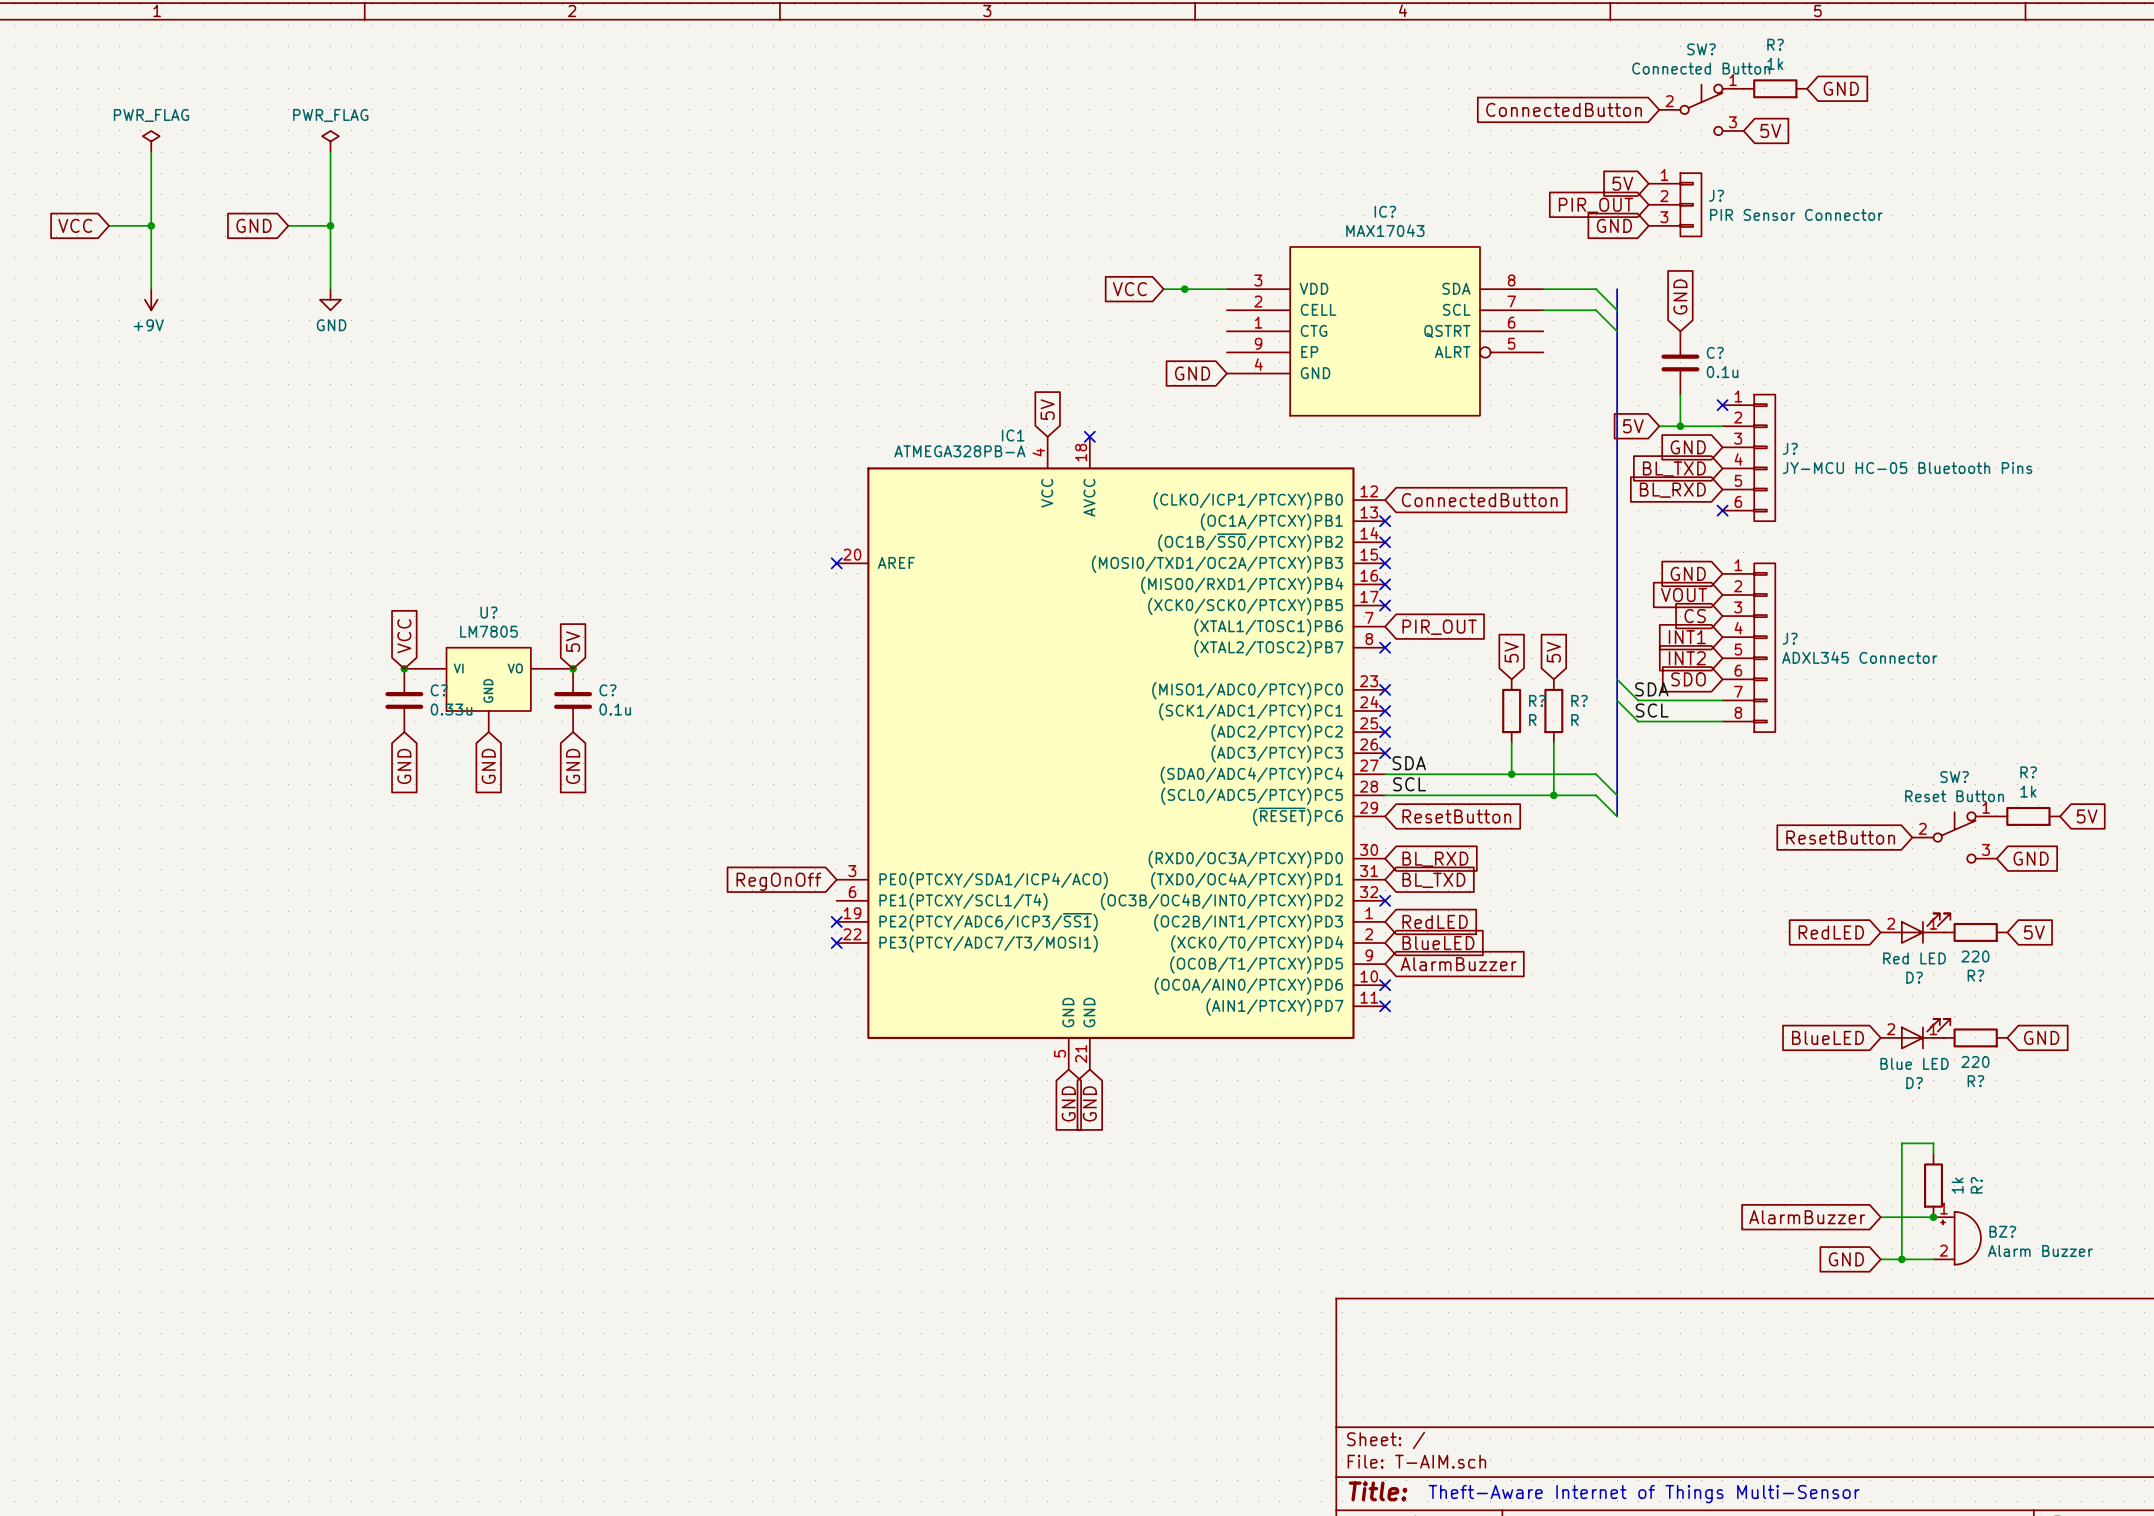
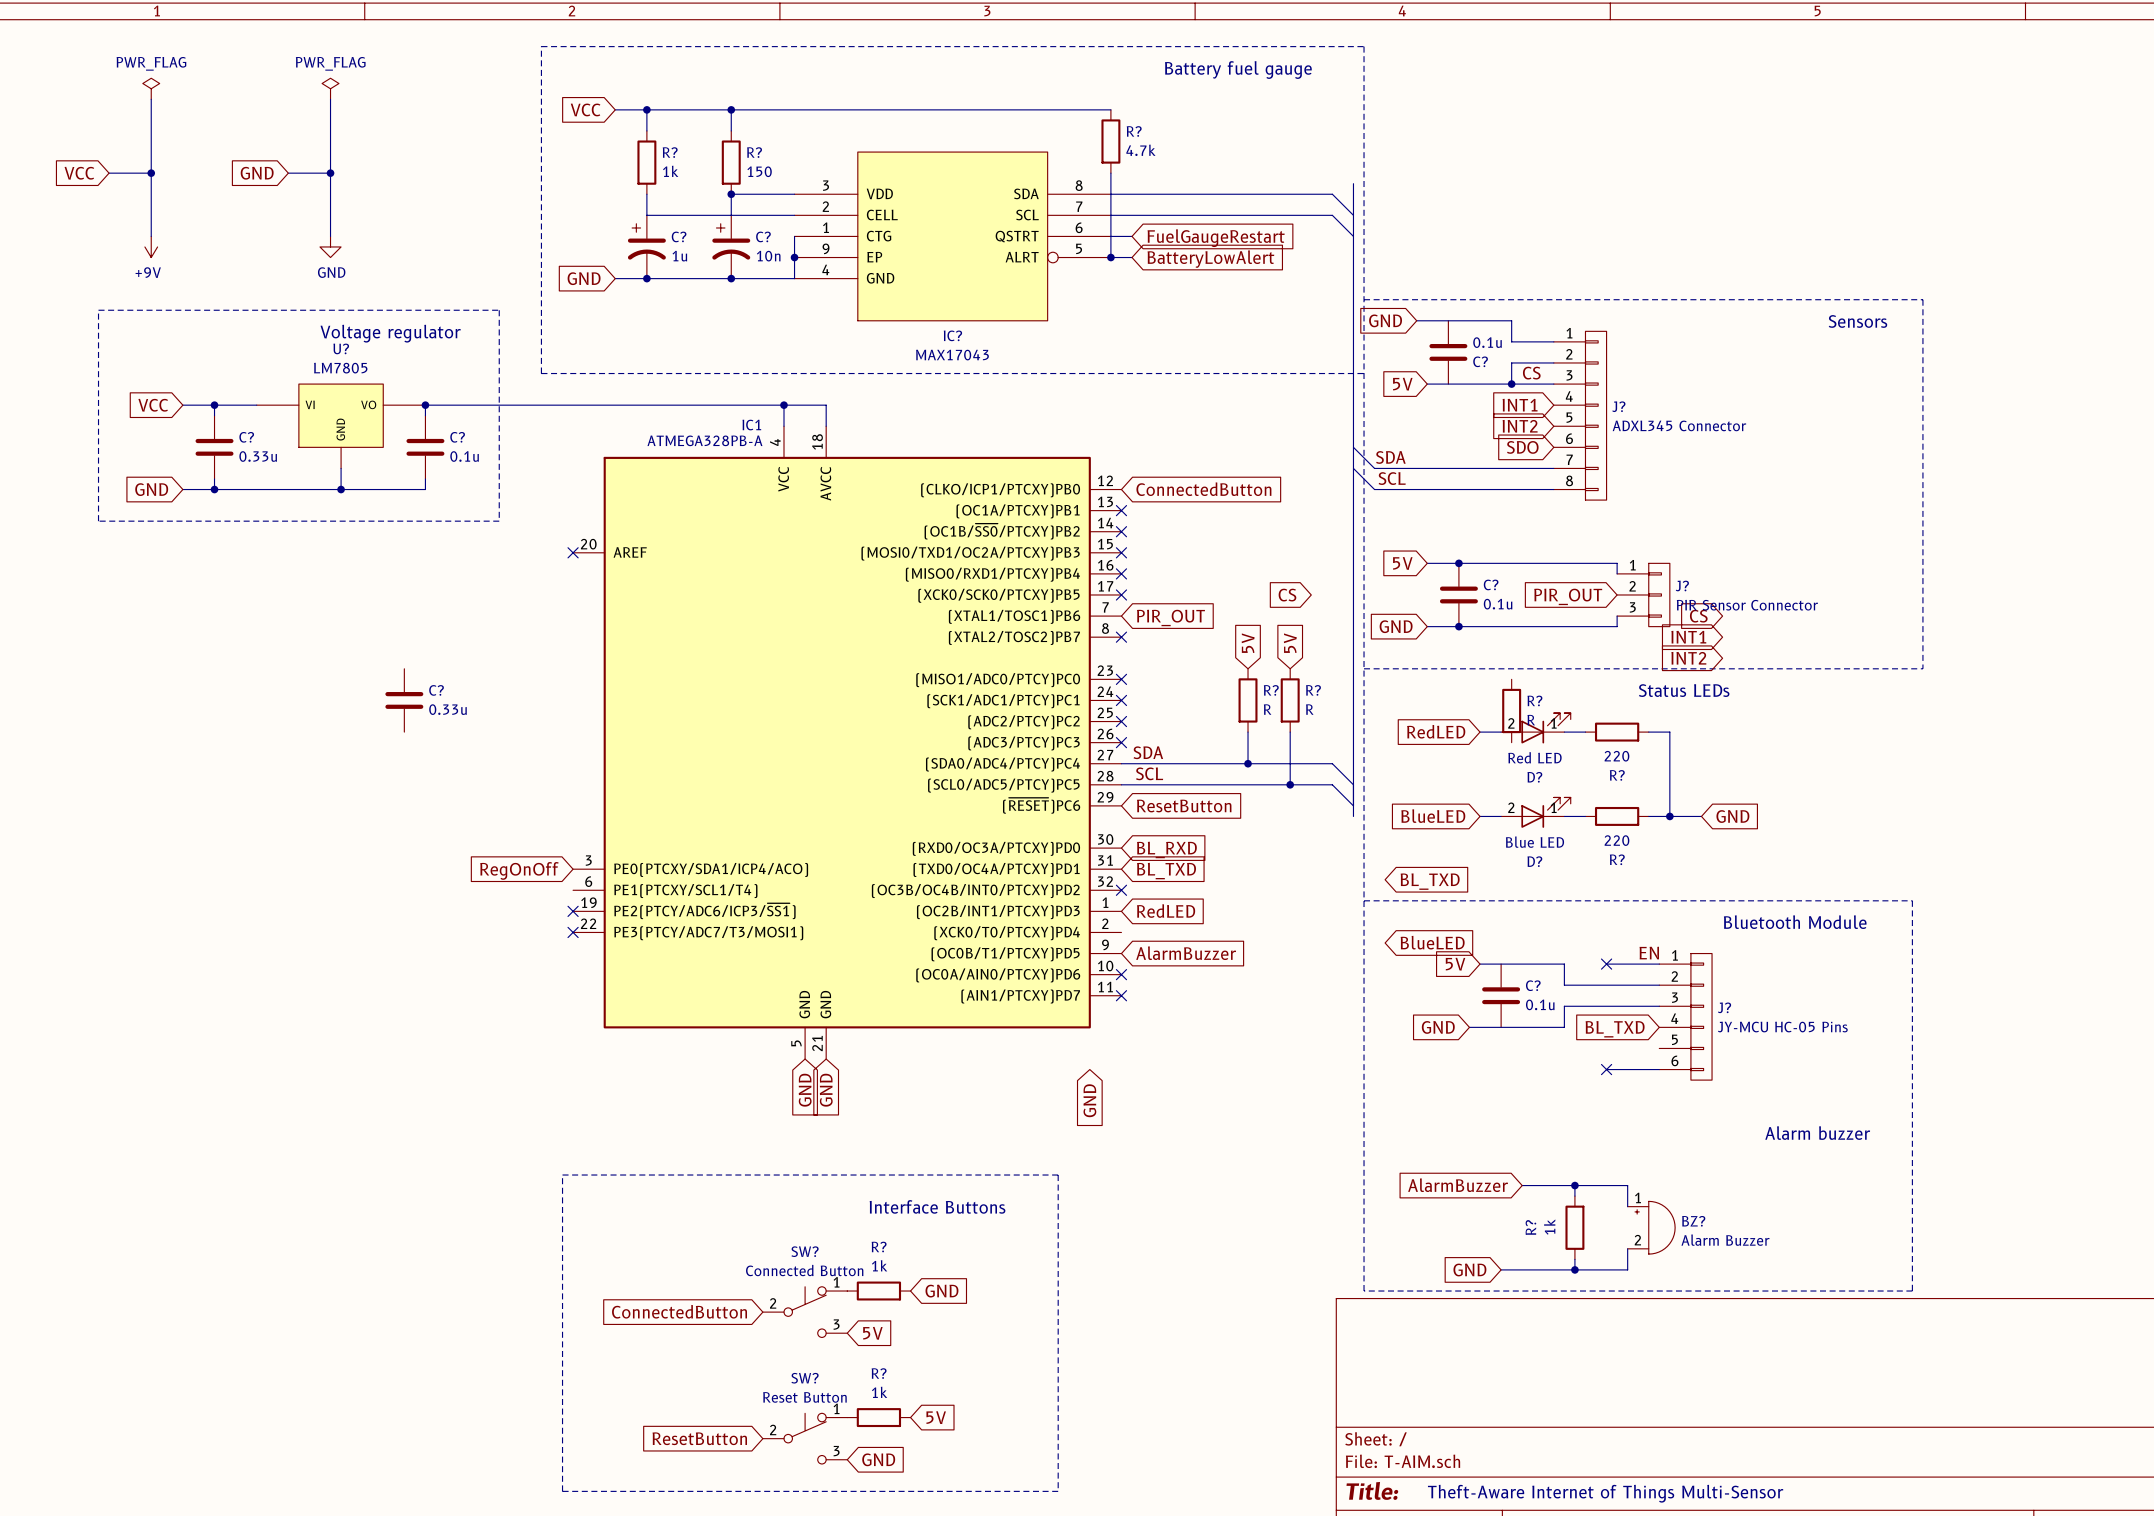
text: none -> Battery fuel gauge (1238, 70)
R?: 1k (1775, 88) -> none
global label: GND (1841, 88) -> none
global label: none -> VCC (585, 109)
wire: none -> (615, 109) (1110, 109)
wire: none -> (646, 109) (646, 130)
junction: none -> (646, 109)
wire: none -> (731, 109) (731, 130)
junction: none -> (731, 109)
global label: ConnectedButton (1564, 109) -> none
SW?: Connected Button (1701, 109) -> none
global label: 5V (1770, 130) -> none
power symbol position: PWR_FLAG (151, 141) -> PWR_FLAG (151, 88)
power symbol position: PWR_FLAG (330, 141) -> PWR_FLAG (330, 88)
R?: none -> 4.7k (1110, 141)
R?: none -> 1k (646, 162)
R?: none -> 150 (731, 162)
junction: none -> (151, 173)
junction: none -> (330, 173)
wire: none -> (1110, 173) (1110, 257) (1132, 257)
bus: none -> (1353, 183) (1353, 816)
global label: 5V (1622, 183) -> none
wire: none -> (646, 194) (646, 215) (794, 215)
junction: none -> (731, 194)
wire: none -> (794, 194) (731, 194) (731, 215)
wire: none -> (1110, 194) (1332, 194) (1353, 215)
J?: PIR Sensor Connector (1675, 204) -> none
global label: PIR_OUT (1596, 205) -> none
wire: none -> (1110, 215) (1332, 215) (1353, 236)
global label position: VCC (75, 225) -> VCC (79, 173)
wire: (109, 225) (151, 225) -> (109, 173) (151, 173)
junction: (151, 225) -> none
global label position: GND (253, 225) -> GND (257, 173)
wire: (288, 225) (330, 225) -> (288, 173) (330, 173)
junction: (330, 225) -> none
global label: GND (1614, 225) -> none
wire: (151, 236) (151, 289) -> (151, 99) (151, 152)
wire: (330, 236) (330, 289) -> (330, 99) (330, 152)
wire: none -> (794, 236) (794, 278) (615, 278)
IC?: none -> MAX17043 (952, 236)
wire: none -> (1110, 236) (1132, 236)
global label: none -> FuelGaugeRestart (1216, 238)
C?: none -> 1u (646, 246)
C?: none -> 10n (731, 246)
junction: none -> (794, 257)
junction: none -> (1110, 257)
global label: none -> BatteryLowAlert (1210, 259)
global label: none -> GND (584, 278)
junction: none -> (646, 278)
junction: none -> (731, 278)
global label: VCC (1129, 289) -> none
wire: (1163, 289) (1226, 289) -> none
junction: (1184, 289) -> none
wire: (1543, 289) (1596, 289) (1617, 310) -> none
bus: (1617, 289) (1617, 816) -> none
global label: GND (1680, 296) -> none
power symbol position: +9V (151, 299) -> +9V (151, 246)
power symbol position: GND (330, 299) -> GND (330, 246)
line: none -> (1364, 299) (1922, 299) (1922, 668) (1364, 668)
line: none -> (98, 310) (98, 521) (499, 521) (499, 310) (98, 310)
wire: (1543, 310) (1596, 310) (1617, 331) -> none
global label: none -> GND (1385, 320)
wire: none -> (1416, 320) (1511, 320) (1511, 341) (1553, 341)
text: none -> Sensors (1857, 321)
IC?: MAX17043 (1385, 331) -> none
text: none -> Voltage regulator (390, 333)
C?: none -> 0.1u (1448, 352)
wire: none -> (1553, 362) (1511, 362) (1511, 384)
C?: 0.1u (1680, 362) -> none
global label: GND (1192, 373) -> none
line: none -> (1364, 373) (541, 373) (541, 46) (1364, 46) (1364, 1291) (1912, 1291) (1912, 900) (1364, 900)
label: none -> CS (1531, 373)
global label: none -> 5V (1402, 384)
wire: none -> (1427, 384) (1553, 384)
junction: none -> (1511, 384)
wire: (1680, 394) (1680, 426) -> none
global label: none -> VCC (153, 405)
wire: none -> (182, 405) (256, 405)
wire: none -> (214, 405) (214, 415)
junction: none -> (214, 405)
junction: none -> (425, 405)
wire: none -> (783, 405) (783, 426)
junction: none -> (783, 405)
global label: none -> INT1 (1520, 405)
no-connect mark: (1722, 405) -> none
global label: 5V (1047, 409) -> none
wire: none -> (425, 415) (425, 405) (826, 405) (826, 426)
J?: none -> ADXL345 Connector (1580, 415)
U?: none -> LM7805 (341, 426)
global label: none -> INT2 (1520, 426)
global label: 5V (1633, 426) -> none
wire: (1659, 426) (1722, 426) -> none
junction: (1680, 426) -> none
no-connect mark: (1089, 436) -> none
C?: none -> 0.33u (214, 447)
C?: none -> 0.1u (425, 447)
wire: none -> (1353, 447) (1374, 468) (1553, 468)
global label: none -> SDO (1522, 447)
global label: GND (1688, 447) -> none
label: none -> SDA (1390, 457)
J?: JY-MCU HC-05 Bluetooth Pins (1748, 457) -> none
wire: none -> (341, 468) (341, 489)
wire: none -> (1353, 468) (1374, 489) (1553, 489)
global label: BL_TXD (1674, 469) -> none
wire: none -> (214, 478) (214, 489)
wire: none -> (425, 478) (425, 489) (182, 489)
label: none -> SCL (1392, 478)
global label: none -> GND (151, 489)
junction: none -> (214, 489)
junction: none -> (341, 489)
global label: none -> ConnectedButton (1203, 489)
global label: BL_RXD (1672, 490) -> none
global label: ConnectedButton (1479, 500) -> none
no-connect mark: none -> (1121, 510)
no-connect mark: (1722, 510) -> none
no-connect mark: (1385, 521) -> none
no-connect mark: none -> (1121, 531)
no-connect mark: (1385, 542) -> none
no-connect mark: none -> (573, 552)
no-connect mark: none -> (1121, 552)
no-connect mark: (836, 563) -> none
no-connect mark: (1385, 563) -> none
global label: none -> 5V (1402, 563)
wire: none -> (1427, 563) (1617, 563) (1617, 573)
junction: none -> (1458, 563)
no-connect mark: none -> (1121, 573)
global label: GND (1688, 573) -> none
no-connect mark: (1385, 584) -> none
no-connect mark: none -> (1121, 594)
global label: none -> CS (1287, 595)
C?: none -> 0.1u (1458, 594)
J?: none -> PIR Sensor Connector (1643, 594)
global label: VOUT (1684, 594) -> none
global label: none -> PIR_OUT (1568, 596)
no-connect mark: (1385, 605) -> none
global label: none -> PIR_OUT (1170, 617)
wire: none -> (1617, 616) (1617, 626) (1427, 626)
global label: none -> GND (1396, 626)
junction: none -> (1458, 626)
global label: PIR_OUT (1439, 627) -> none
global label: VCC (404, 636) -> none
no-connect mark: none -> (1121, 637)
global label: 5V (573, 641) -> none
global label: none -> 5V (1248, 643)
global label: none -> 5V (1290, 643)
no-connect mark: (1385, 647) -> none
J?: ADXL345 Connector (1748, 647) -> none
global label: 5V (1511, 652) -> none
global label: 5V (1553, 652) -> none
junction: (404, 668) -> none
junction: (573, 668) -> none
no-connect mark: none -> (1121, 679)
wire: (1617, 679) (1638, 700) (1722, 700) -> none
global label: SDO (1688, 679) -> none
U?: LM7805 (488, 689) -> none
no-connect mark: (1385, 689) -> none
label: SDA (1651, 689) -> none
text: none -> Status LEDs (1684, 690)
C?: 0.1u (573, 700) -> none
no-connect mark: none -> (1121, 700)
R?: none -> R (1248, 700)
R?: none -> R (1290, 700)
wire: (1617, 700) (1638, 721) (1722, 721) -> none
no-connect mark: (1385, 710) -> none
R?: R (1553, 710) -> none
label: SCL (1652, 710) -> none
no-connect mark: none -> (1121, 721)
D?: none -> Red LED (1535, 728)
no-connect mark: (1385, 732) -> none
global label: none -> RedLED (1436, 731)
wire: none -> (1480, 732) (1501, 732)
wire: none -> (1564, 732) (1585, 732)
R?: none -> 220 (1617, 732)
wire: none -> (1648, 732) (1669, 732) (1669, 816)
no-connect mark: none -> (1121, 742)
wire: (1511, 742) (1511, 774) -> none
wire: (1553, 742) (1553, 795) -> none
label: none -> SDA (1148, 752)
IC1 position: (1110, 753) -> (847, 742)
no-connect mark: (1385, 753) -> none
junction: none -> (1248, 763)
label: SDA (1409, 763) -> none
global label: GND (404, 766) -> none
global label: GND (488, 766) -> none
global label: GND (573, 766) -> none
label: none -> SCL (1149, 773)
wire: (1385, 774) (1596, 774) (1617, 795) -> none
junction: (1511, 774) -> none
junction: none -> (1290, 784)
label: SCL (1409, 784) -> none
wire: (1385, 795) (1596, 795) (1617, 816) -> none
junction: (1553, 795) -> none
global label: none -> ResetButton (1184, 806)
D?: none -> Blue LED (1535, 812)
global label: none -> BlueLED (1433, 816)
global label: ResetButton (1456, 816) -> none
wire: none -> (1480, 816) (1501, 816)
wire: none -> (1564, 816) (1585, 816)
R?: none -> 220 (1617, 816)
wire: none -> (1648, 816) (1701, 816)
junction: none -> (1669, 816)
global label: none -> GND (1732, 816)
R?: 1k (2028, 816) -> none
global label: 5V (2087, 816) -> none
global label: ResetButton (1840, 837) -> none
SW?: Reset Button (1954, 837) -> none
global label: none -> BL_RXD (1166, 849)
global label: GND (2031, 858) -> none
global label: BL_RXD (1435, 859) -> none
global label: none -> BL_TXD (1166, 871)
global label: none -> RegOnOff (519, 870)
global label: RegOnOff (778, 881) -> none
no-connect mark: none -> (1121, 890)
no-connect mark: (1385, 900) -> none
no-connect mark: none -> (573, 911)
global label: none -> RedLED (1166, 911)
no-connect mark: (836, 921) -> none
global label: RedLED (1435, 921) -> none
text: none -> Bluetooth Module (1795, 922)
D?: Red LED (1915, 928) -> none
no-connect mark: none -> (573, 932)
global label: RedLED (1831, 932) -> none
R?: 220 (1975, 932) -> none
global label: 5V (2034, 932) -> none
no-connect mark: (836, 943) -> none
global label: none -> AlarmBuzzer (1186, 953)
label: none -> EN (1649, 953)
global label: none -> 5V (1455, 964)
global label: AlarmBuzzer (1458, 964) -> none
wire: none -> (1480, 964) (1564, 964) (1564, 985) (1659, 985)
wire: none -> (1606, 964) (1659, 964)
no-connect mark: none -> (1606, 964)
no-connect mark: none -> (1121, 974)
no-connect mark: (1385, 985) -> none
no-connect mark: none -> (1121, 995)
C?: none -> 0.1u (1501, 995)
no-connect mark: (1385, 1006) -> none
wire: none -> (1659, 1006) (1564, 1006) (1564, 1027) (1469, 1027)
J?: none -> JY-MCU HC-05 Pins (1685, 1016)
global label: none -> GND (1438, 1027)
global label: none -> BL_TXD (1615, 1029)
D?: Blue LED (1915, 1034) -> none
global label: BlueLED (1828, 1037) -> none
R?: 220 (1975, 1037) -> none
global label: GND (2041, 1037) -> none
wire: none -> (1606, 1069) (1659, 1069)
no-connect mark: none -> (1606, 1069)
global label: none -> GND (805, 1090)
global label: none -> GND (826, 1090)
global label: GND (1068, 1103) -> none
text: none -> Alarm buzzer (1817, 1133)
wire: (1933, 1153) (1933, 1143) (1901, 1143) (1901, 1259) -> none
line: none -> (562, 1175) (1058, 1175) (1058, 1491) (562, 1491) (562, 1175)
global label: none -> AlarmBuzzer (1458, 1185)
wire: none -> (1522, 1185) (1627, 1185) (1627, 1206)
wire: none -> (1574, 1185) (1574, 1196)
junction: none -> (1574, 1185)
R?: 1k (1933, 1185) -> none
text: none -> Interface Buttons (937, 1206)
global label: AlarmBuzzer (1807, 1217) -> none
wire: (1880, 1217) (1933, 1217) -> none
junction: (1933, 1217) -> none
R?: none -> 1k (1574, 1227)
BZ?: none -> Alarm Buzzer (1651, 1227)
BZ?: Alarm Buzzer (1957, 1238) -> none
wire: none -> (1627, 1248) (1627, 1269) (1501, 1269)
wire: none -> (1574, 1259) (1574, 1269)
global label: GND (1846, 1259) -> none
wire: (1880, 1259) (1933, 1259) -> none
junction: (1901, 1259) -> none
global label: none -> GND (1469, 1269)
junction: none -> (1574, 1269)
R?: none -> 1k (878, 1291)
global label: none -> GND (941, 1291)
global label: none -> ConnectedButton (679, 1311)
SW?: none -> Connected Button (805, 1312)
global label: none -> 5V (872, 1333)
R?: none -> 1k (878, 1417)
global label: none -> 5V (936, 1417)
global label: none -> ResetButton (699, 1438)
SW?: none -> Reset Button (805, 1438)
global label: none -> GND (878, 1459)

